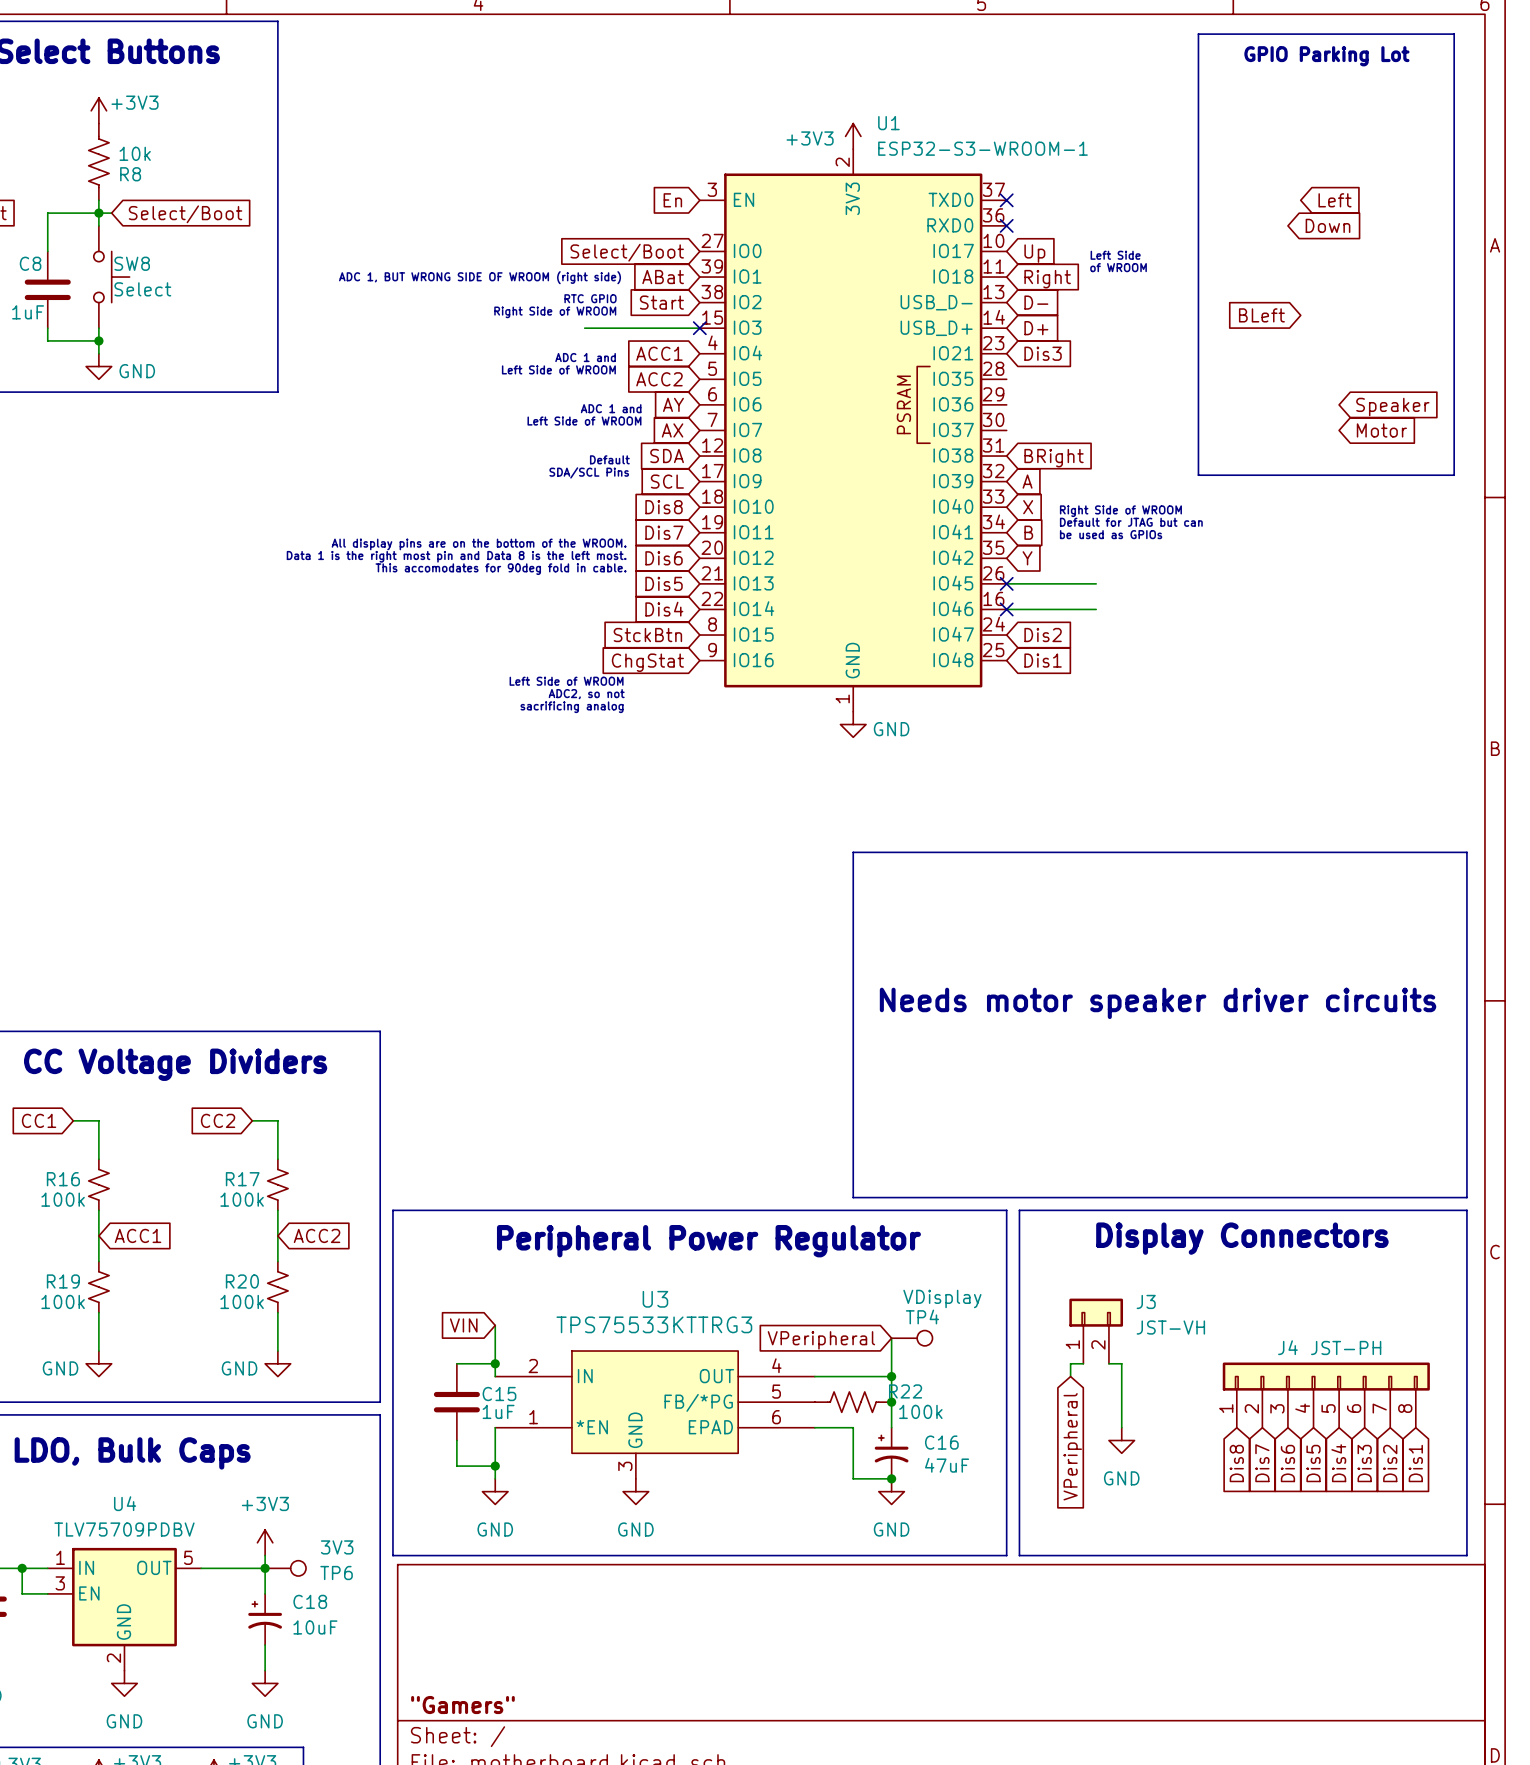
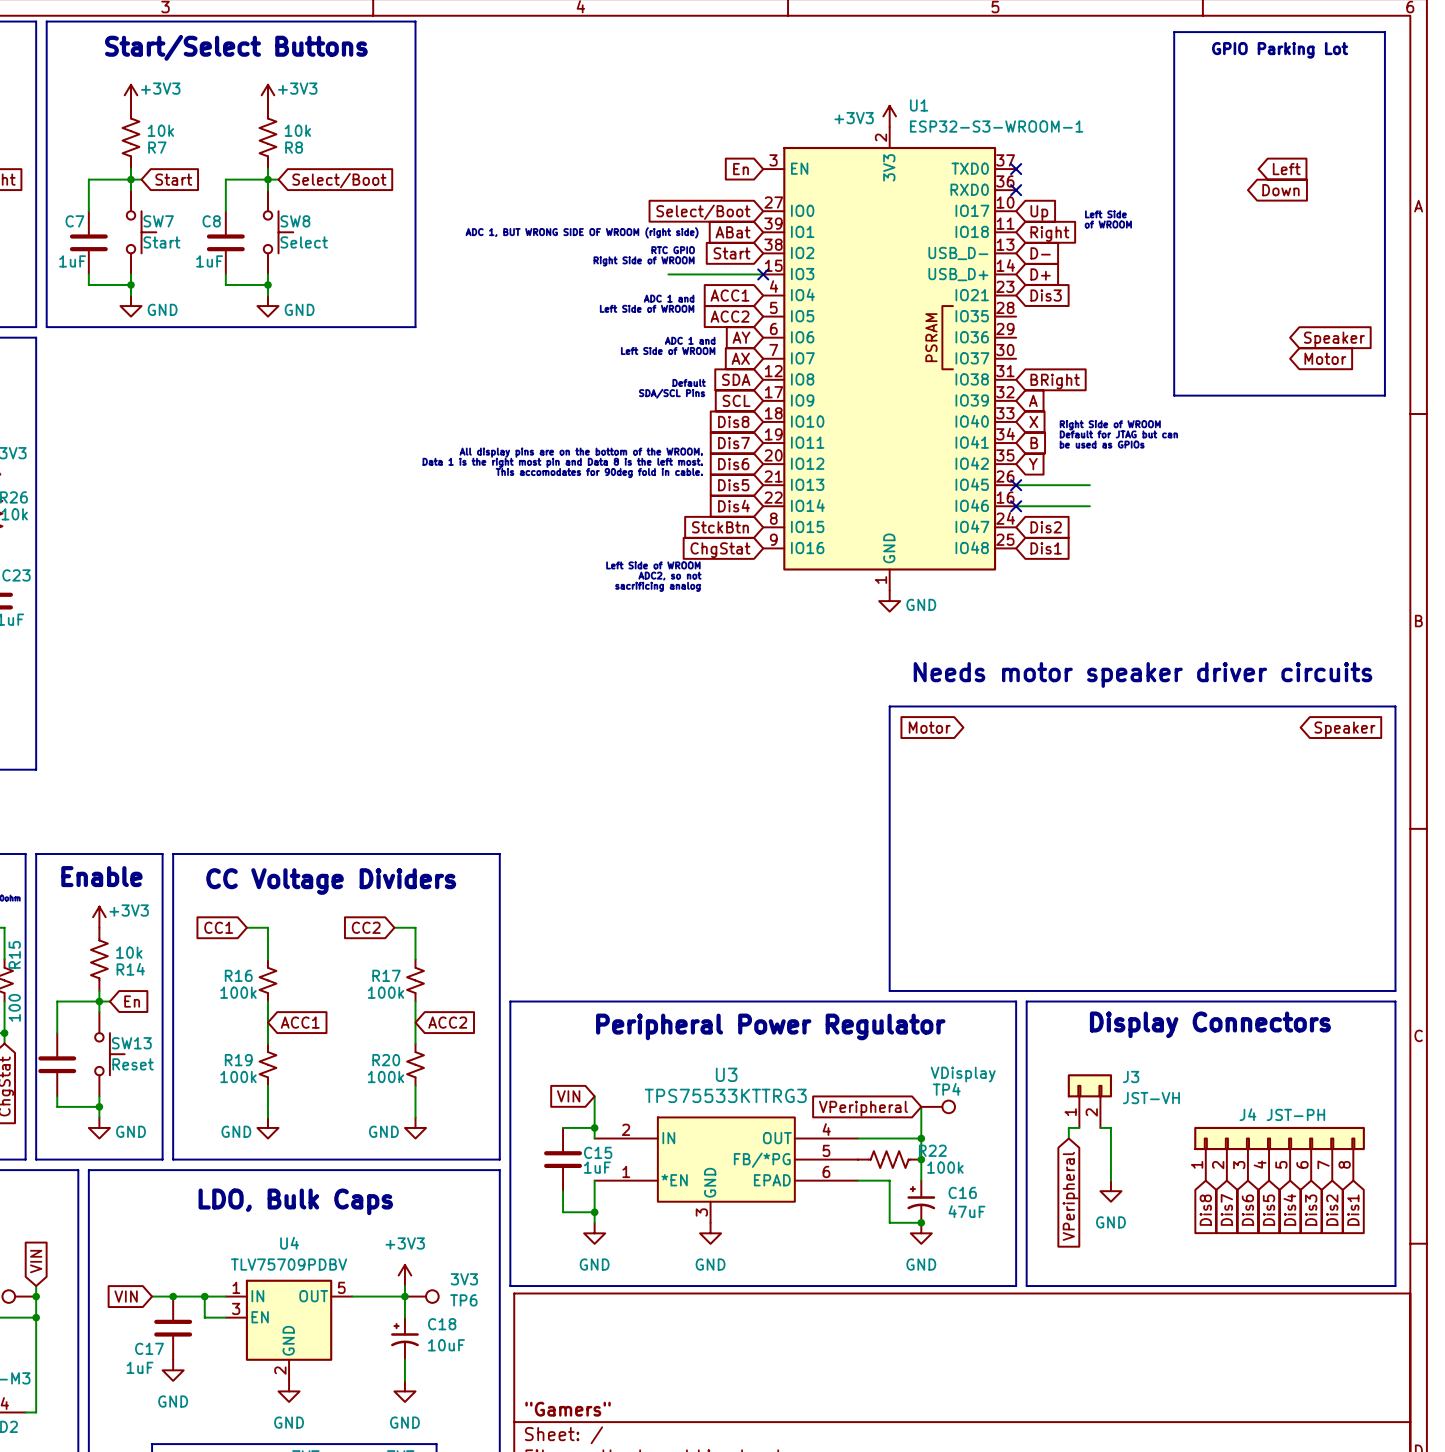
global label: BLeft (1261, 315) -> none
global label: none -> Motor (929, 727)
global label: none -> Speaker (1344, 729)
text position: Needs motor speaker driver circuits (1158, 1003) -> Needs motor speaker driver circuits (1142, 674)

